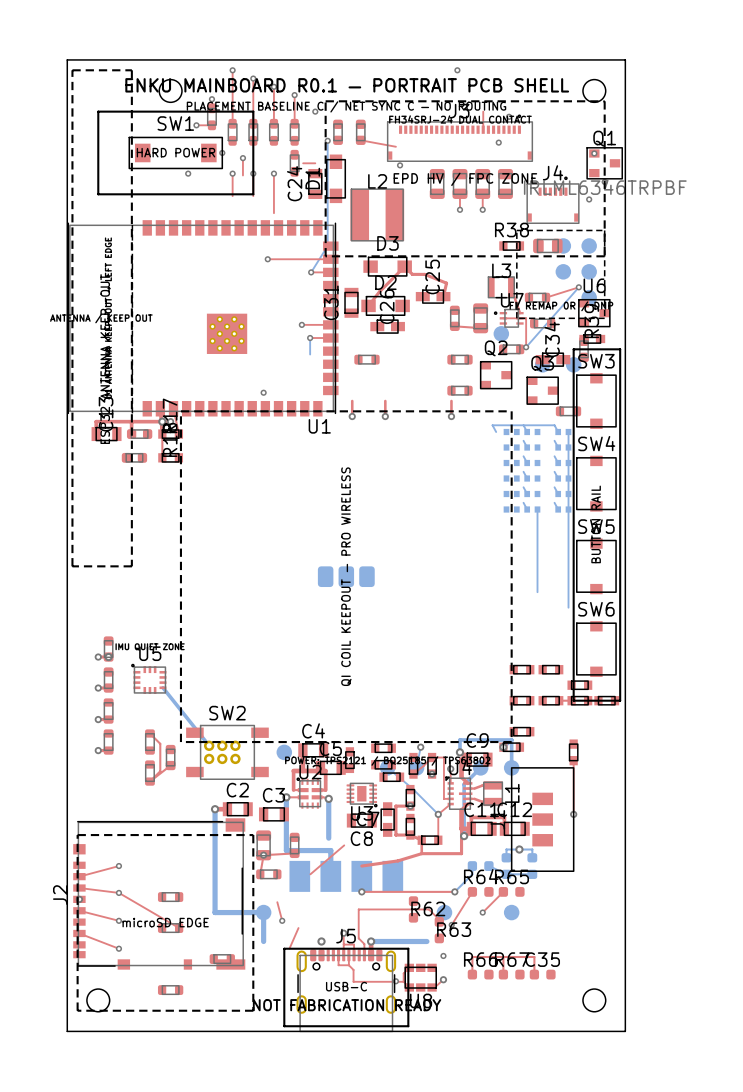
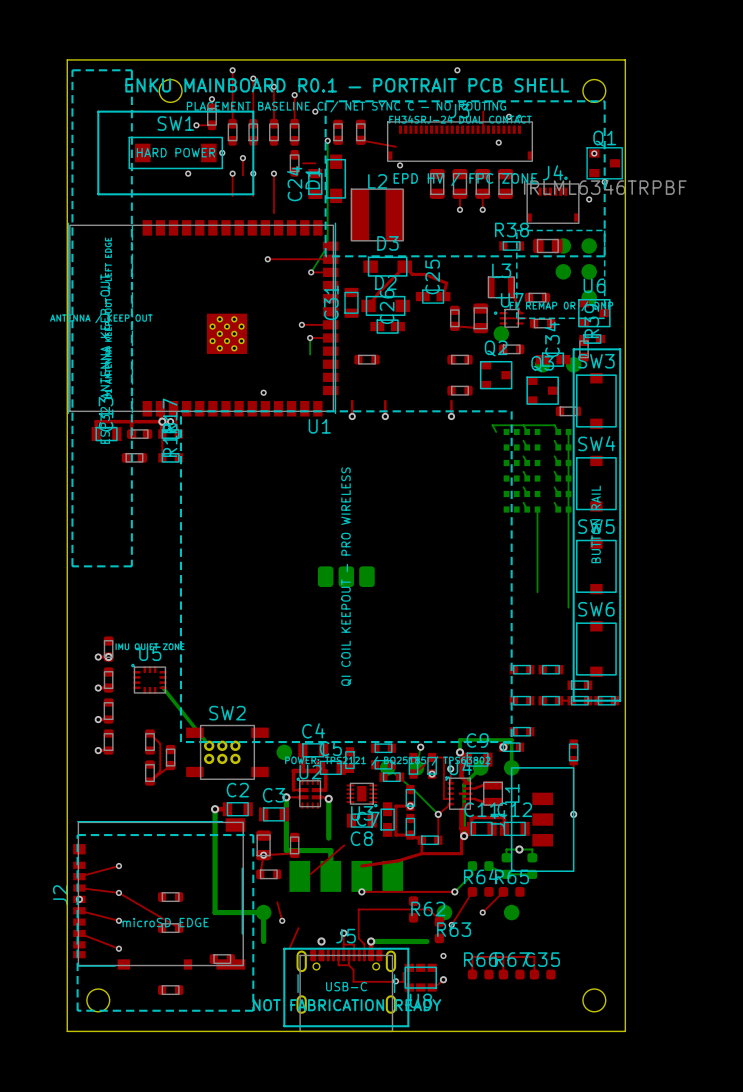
top track: (578, 287) (546, 297) -> none
bottom track: (578, 287) (526, 347) -> none
via: (578, 287) -> none
top track: (526, 318) (526, 347) -> none
via: (526, 347) -> none

